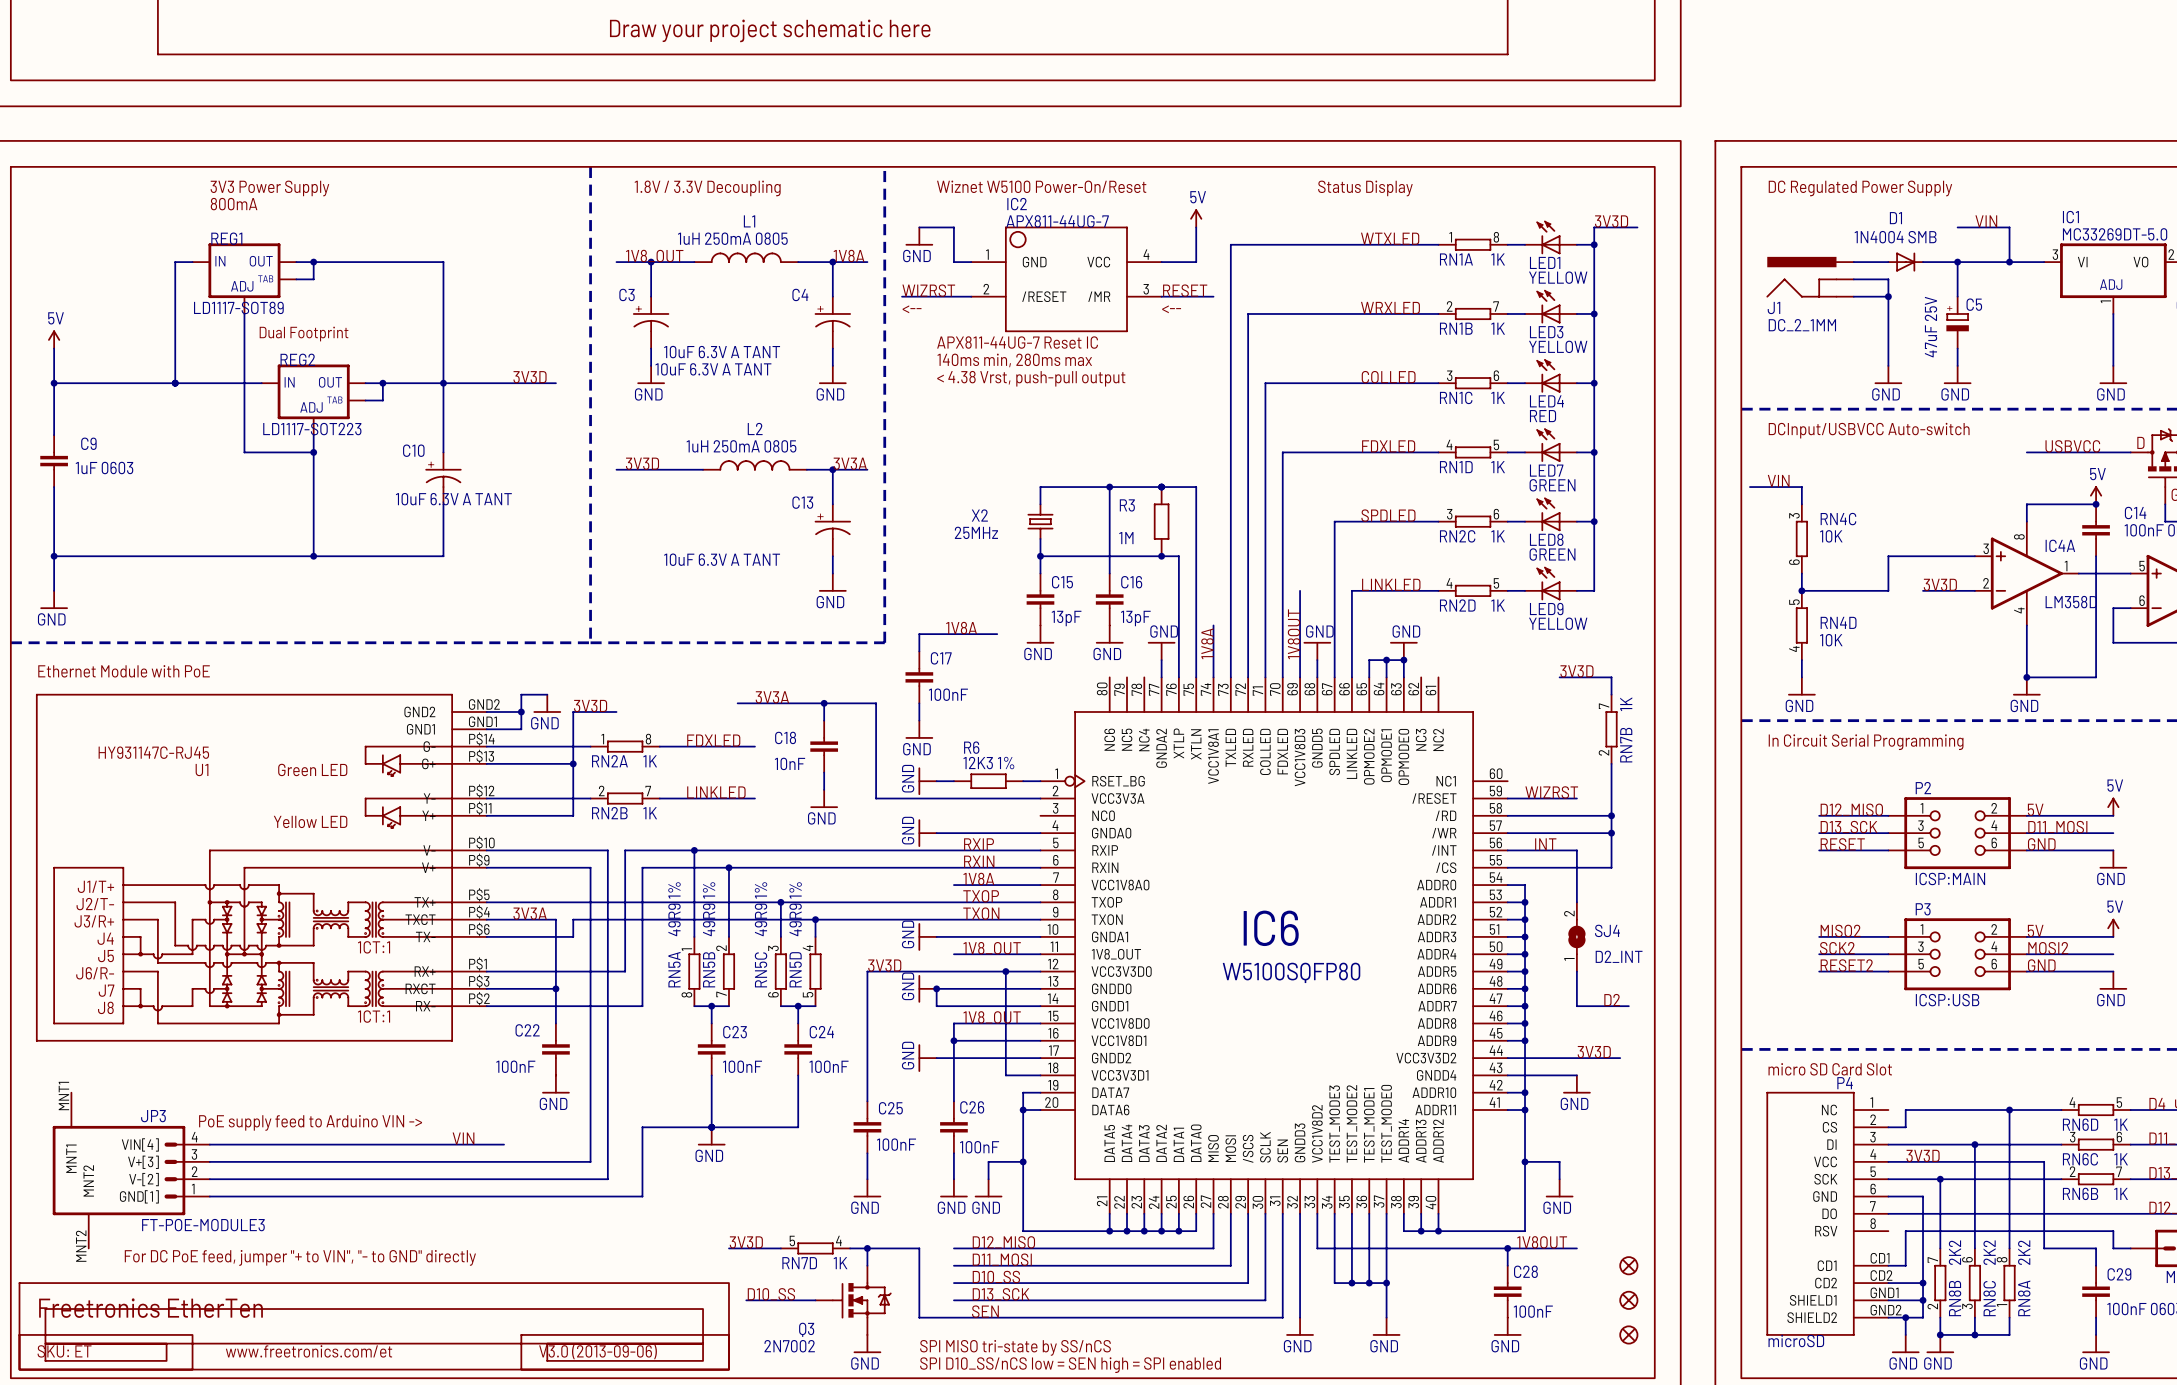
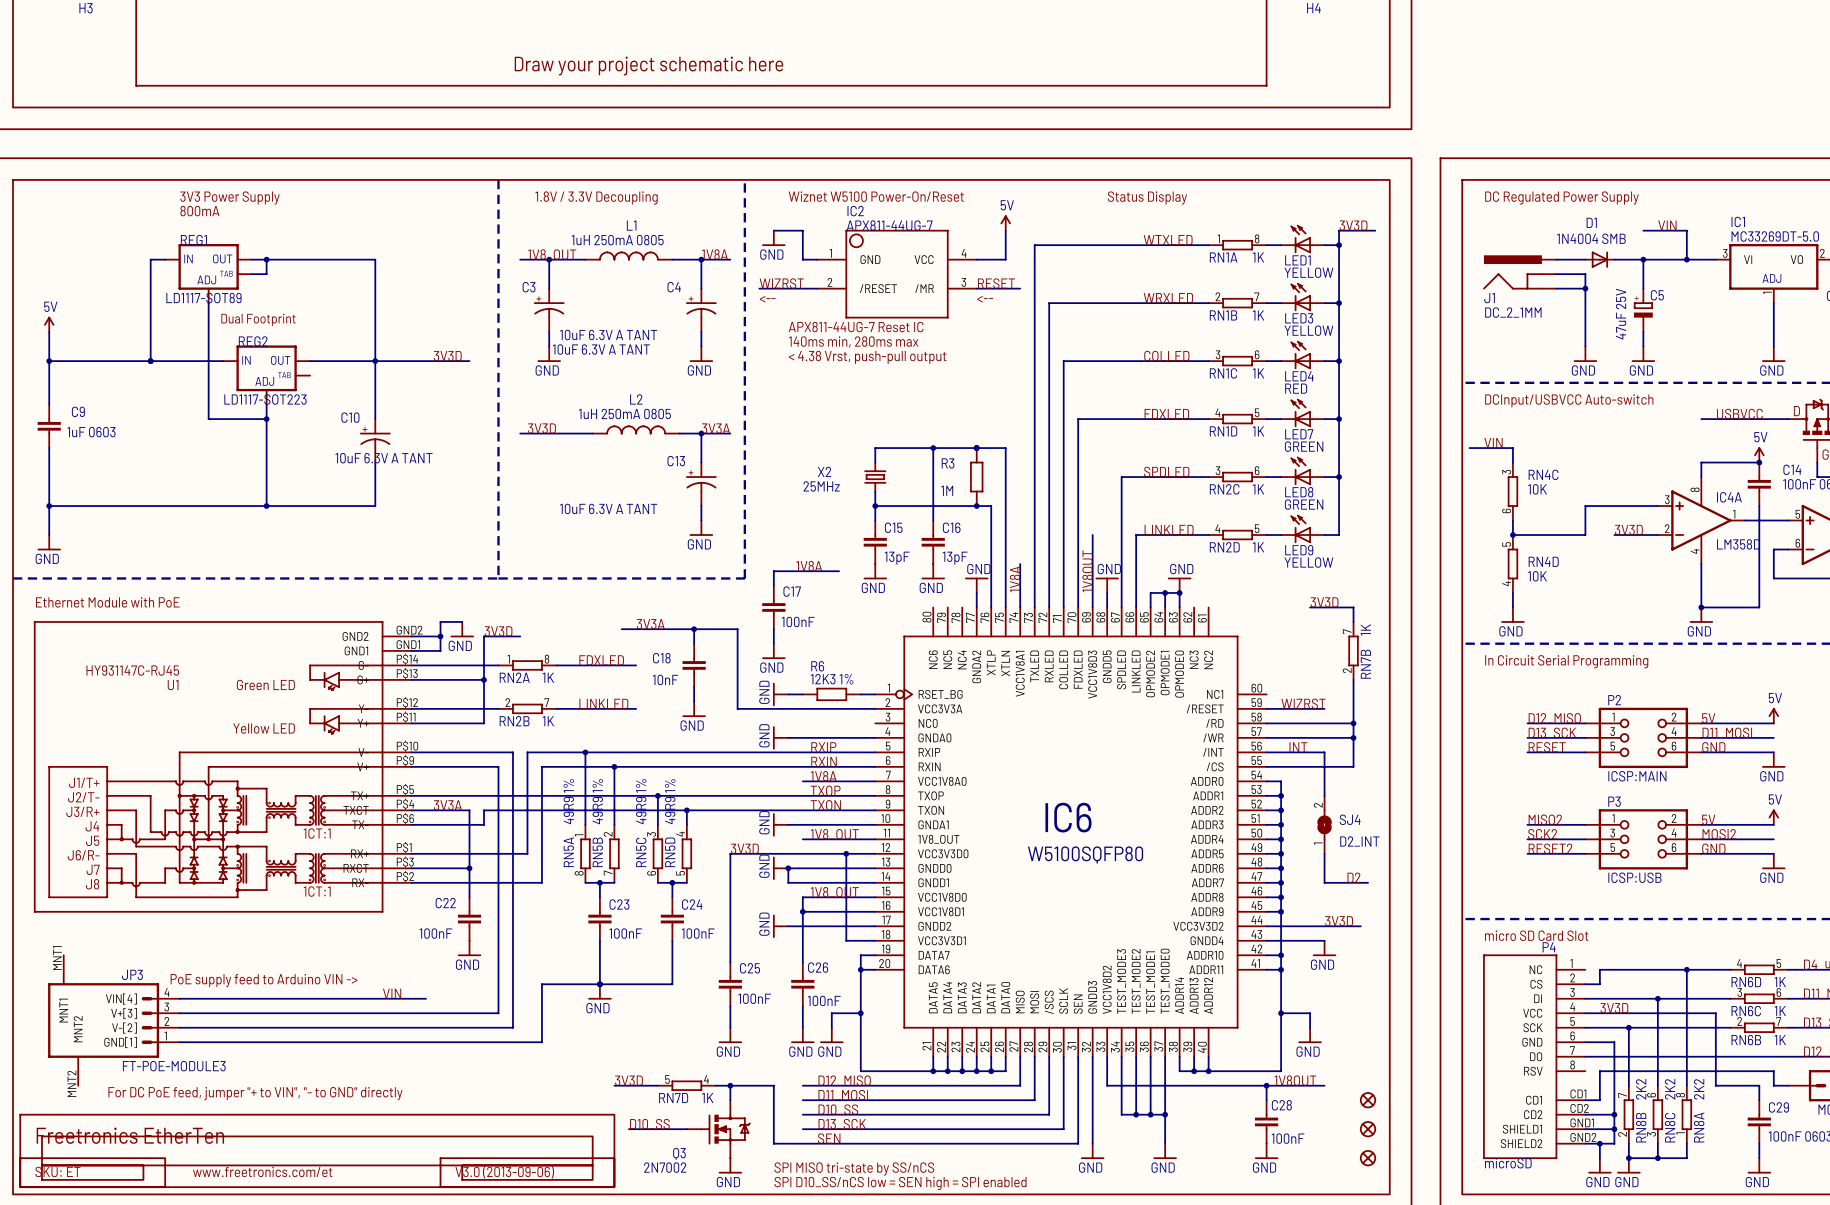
wire: (382, 383) (382, 400) (365, 400) -> none
junction: (382, 383) -> none

